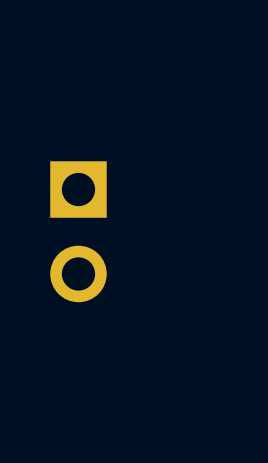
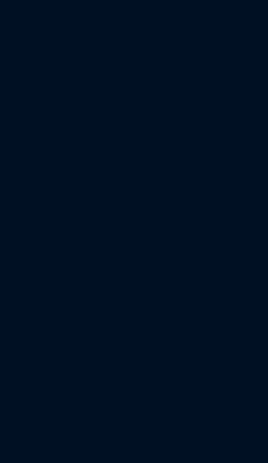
part: (78, 231) -> none

